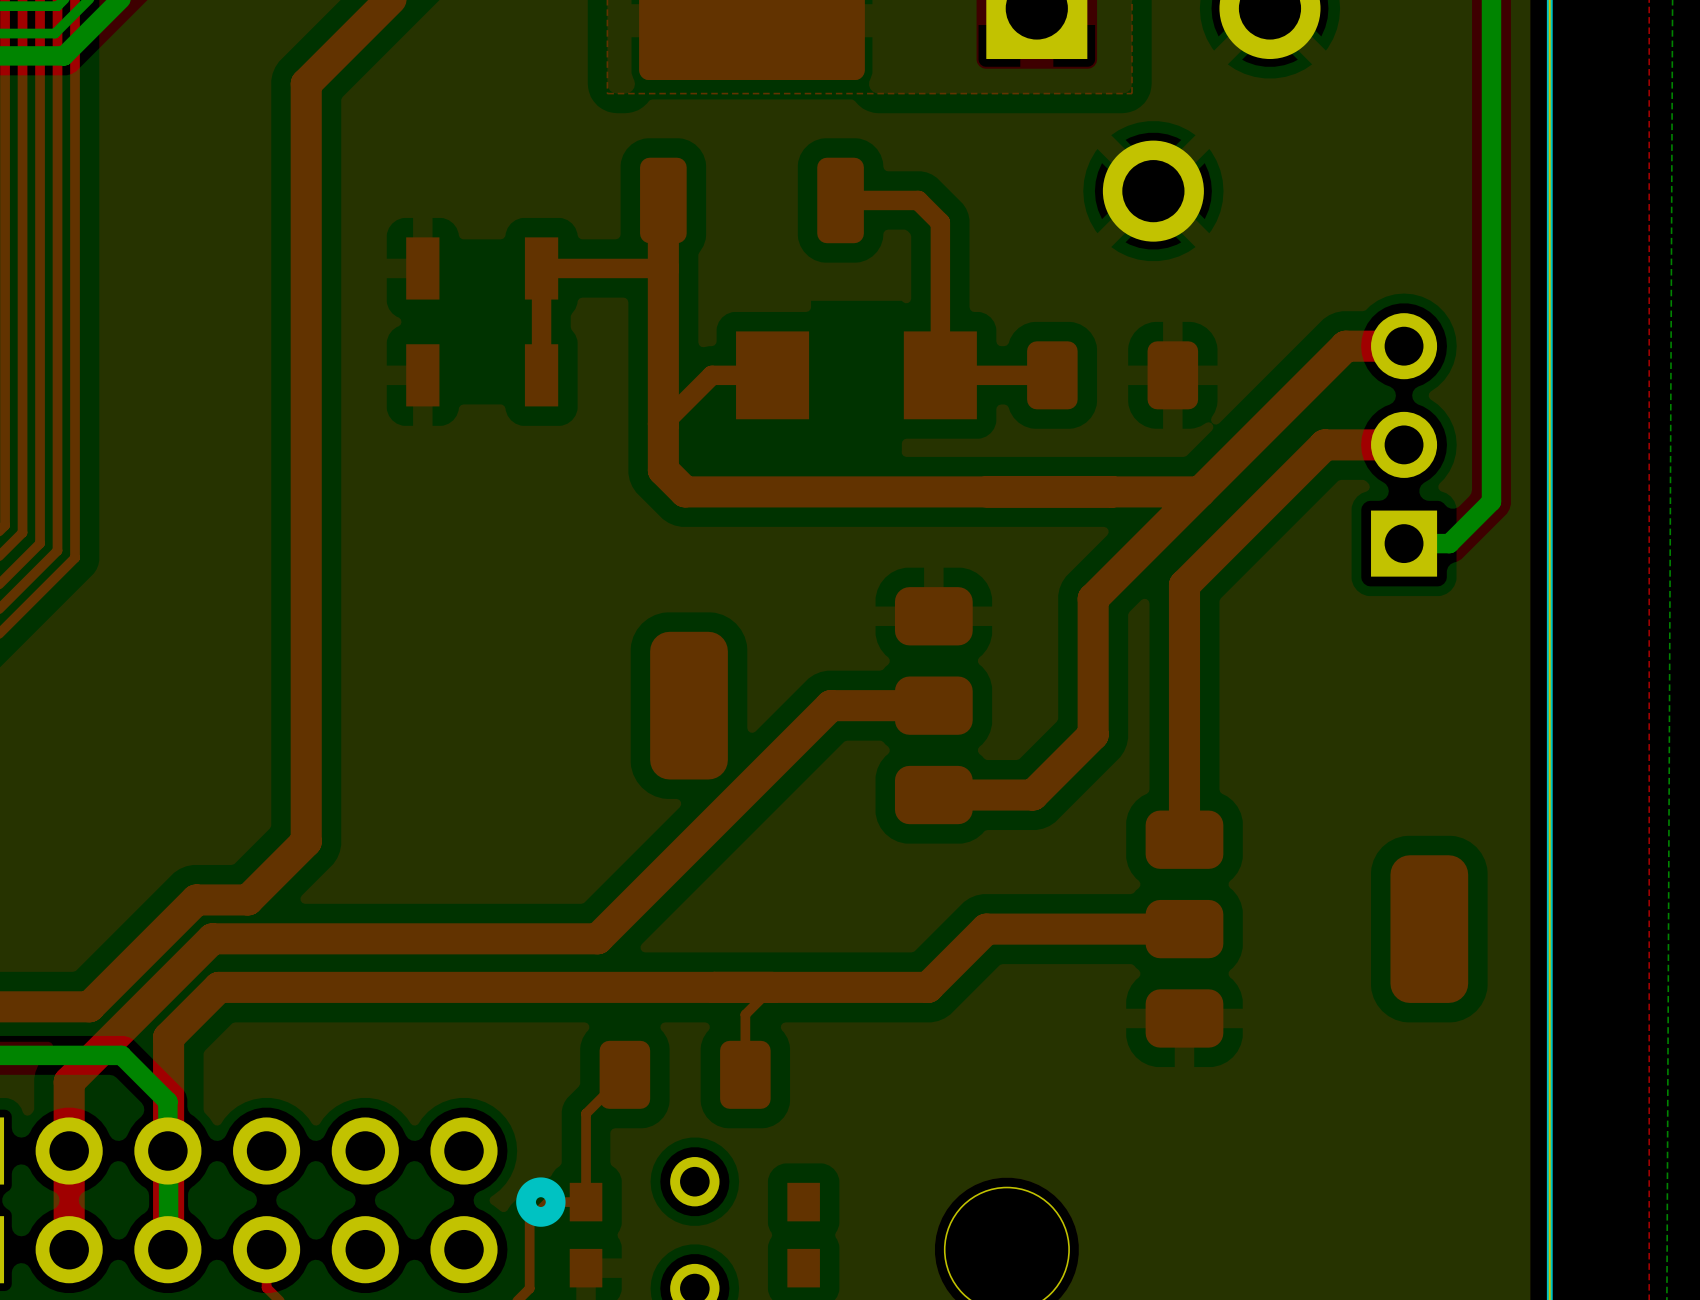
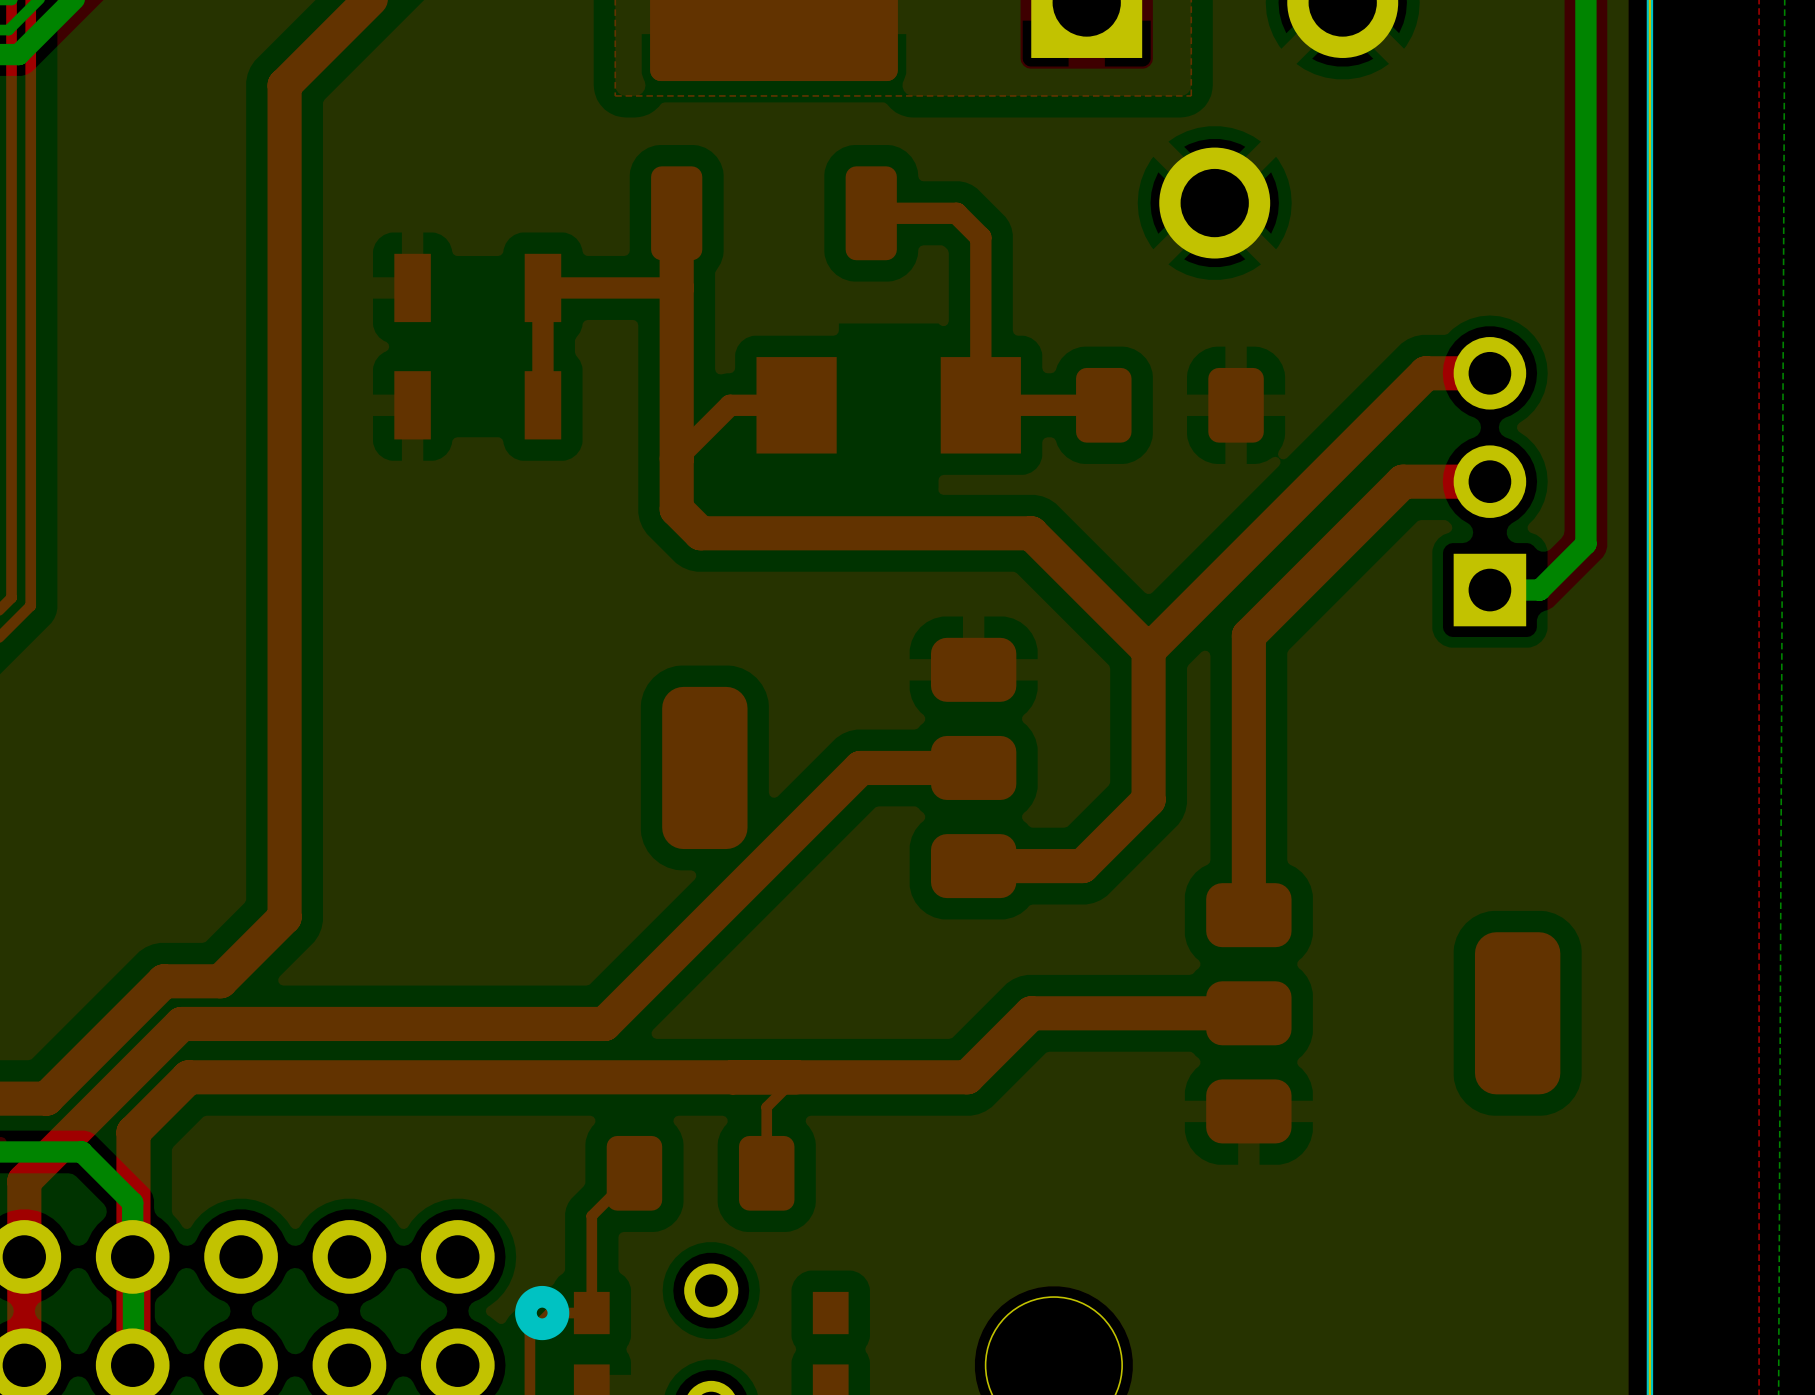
top track: (1200, 491) (986, 491) -> (1148, 650) (1031, 533)

